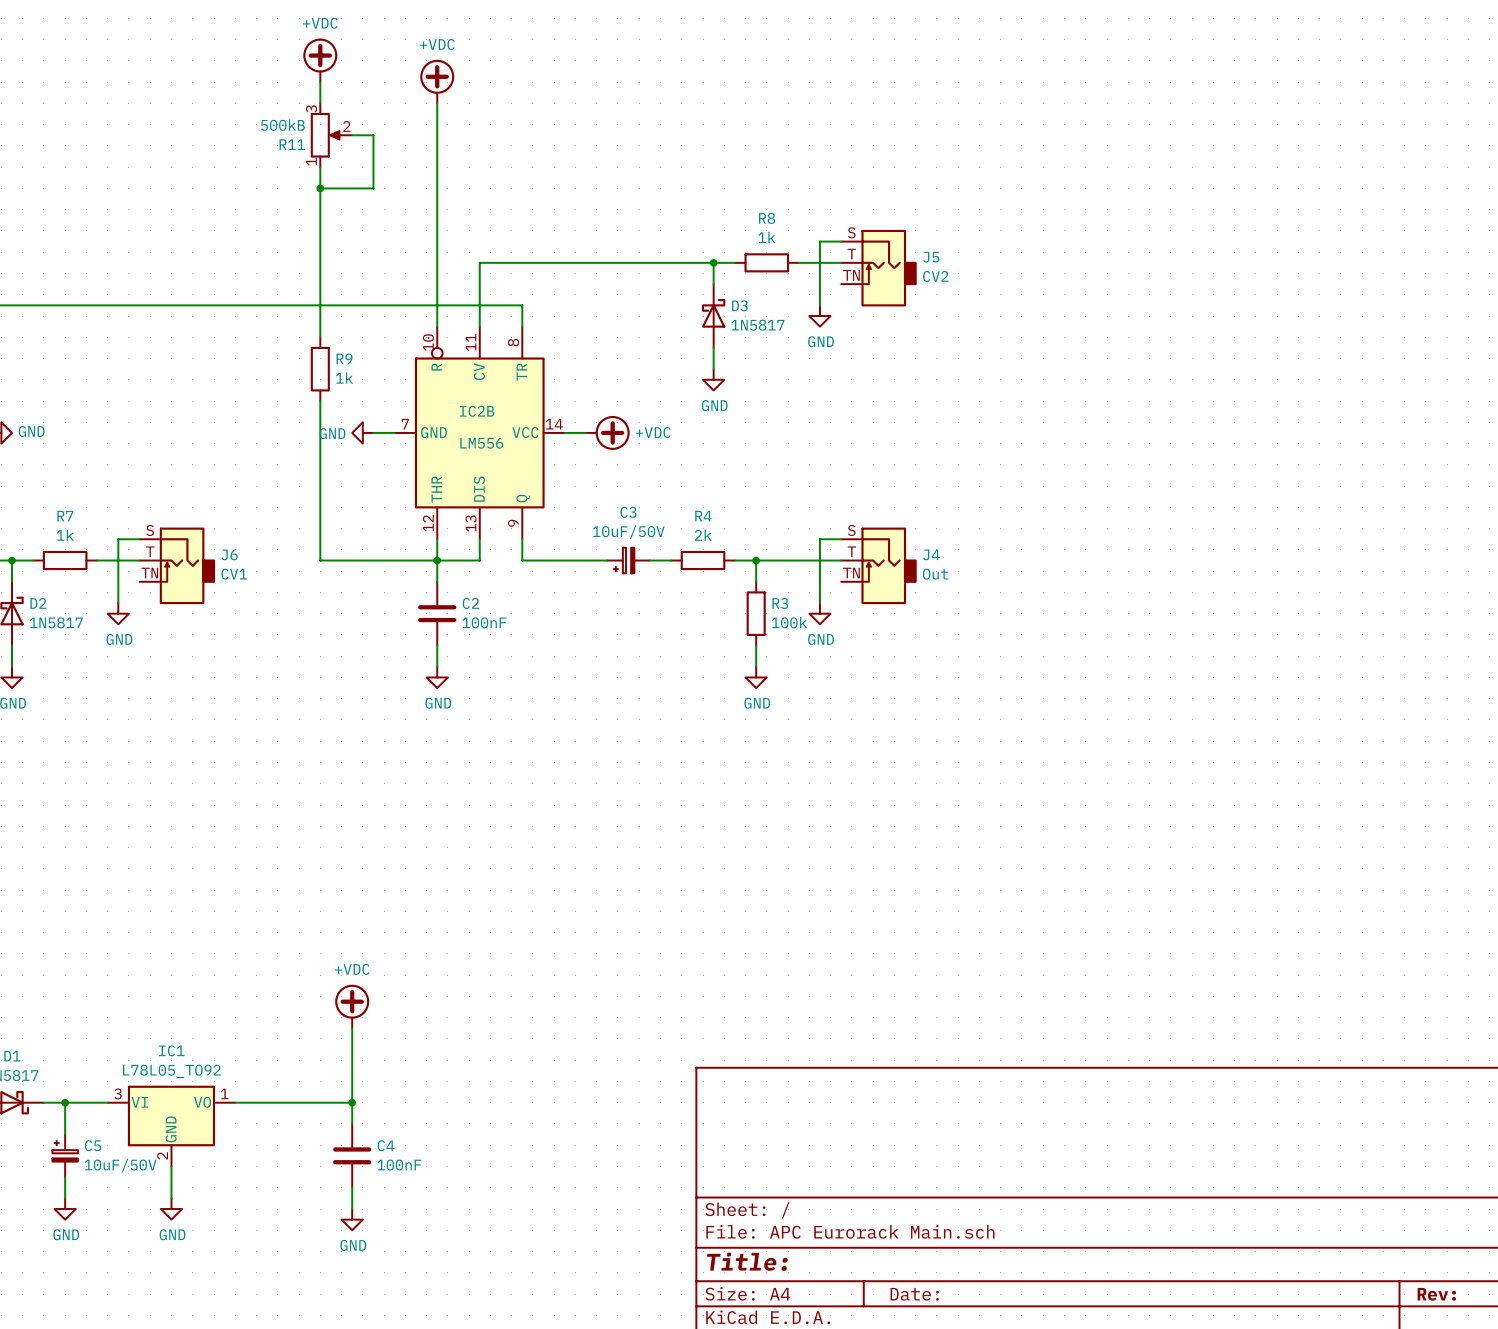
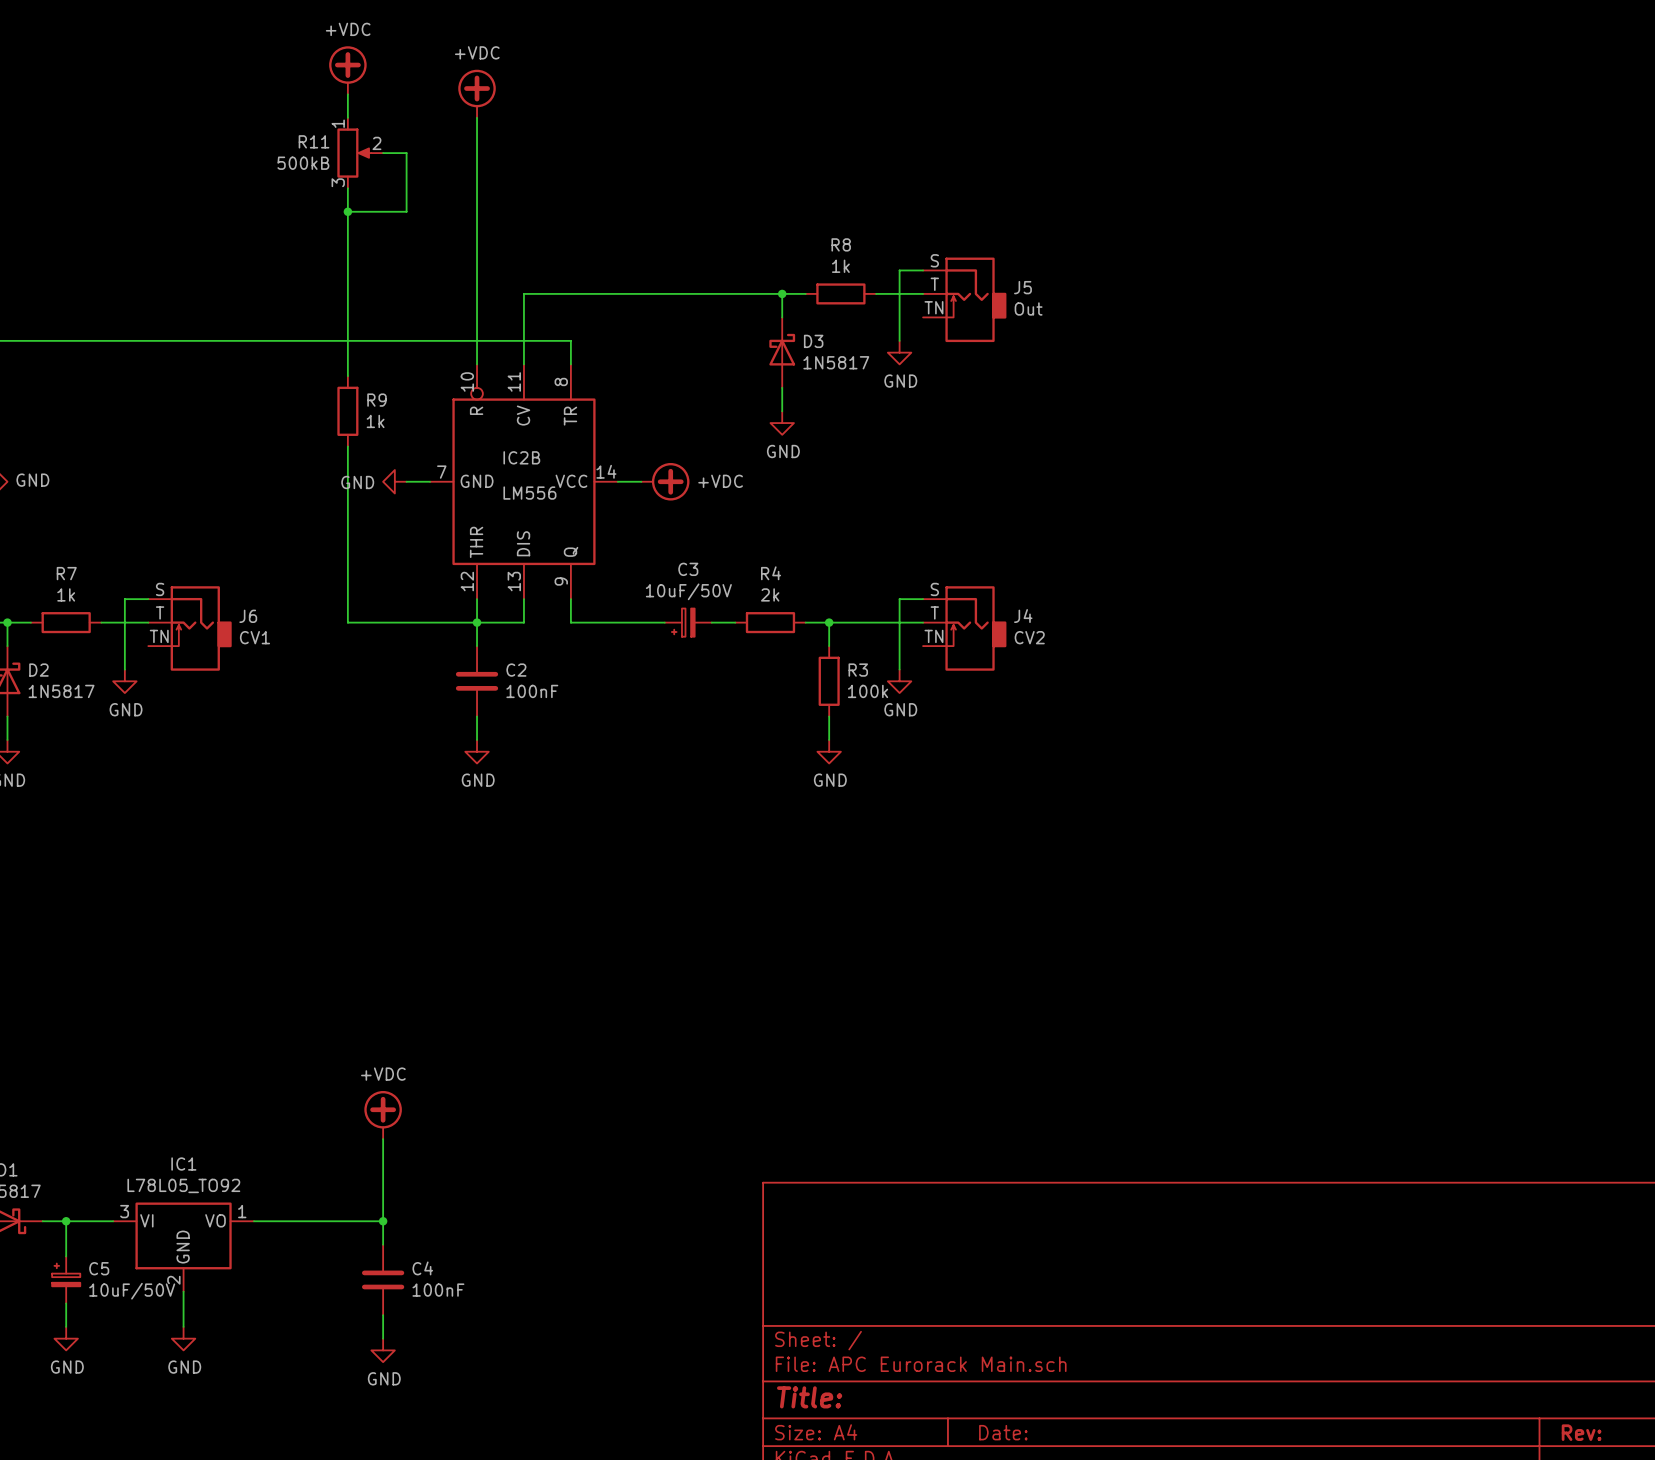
R11 flip: as is (326, 135) -> up-down (354, 153)
J5 value: CV2 (935, 276) -> Out (1028, 309)
J4 value: Out (935, 574) -> CV2 (1029, 637)

